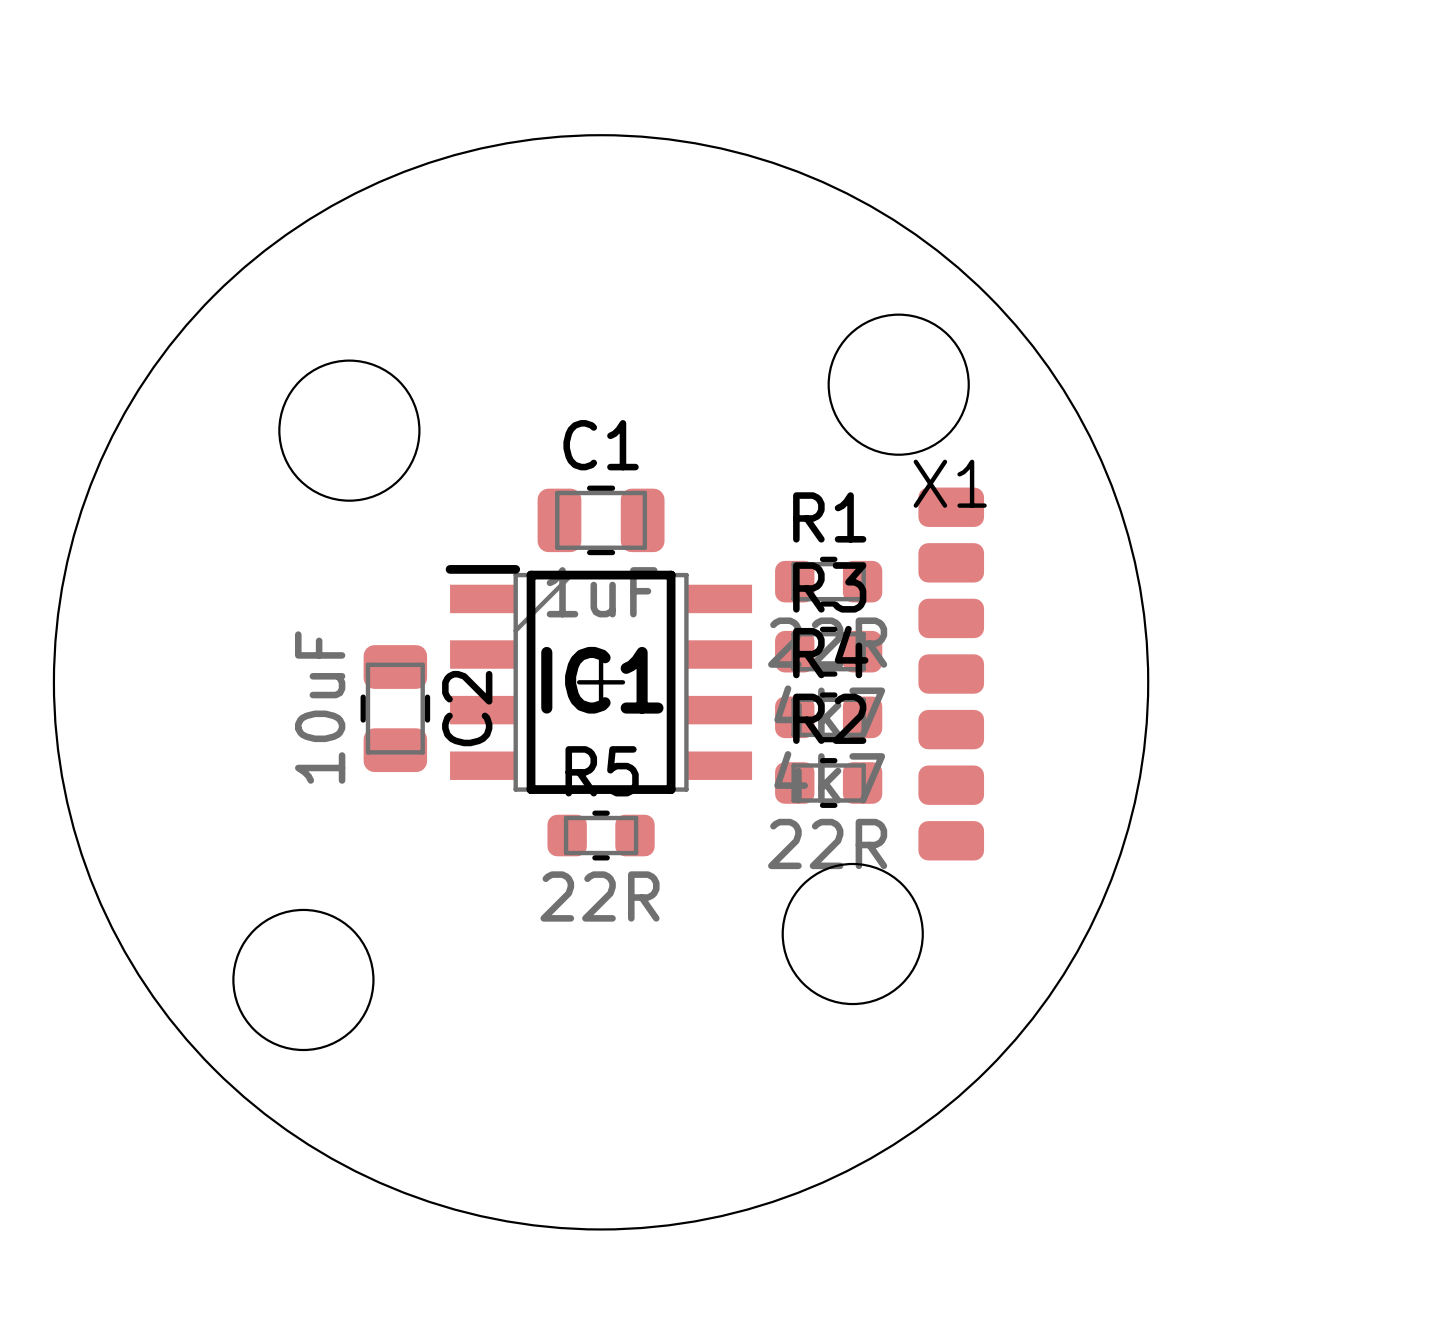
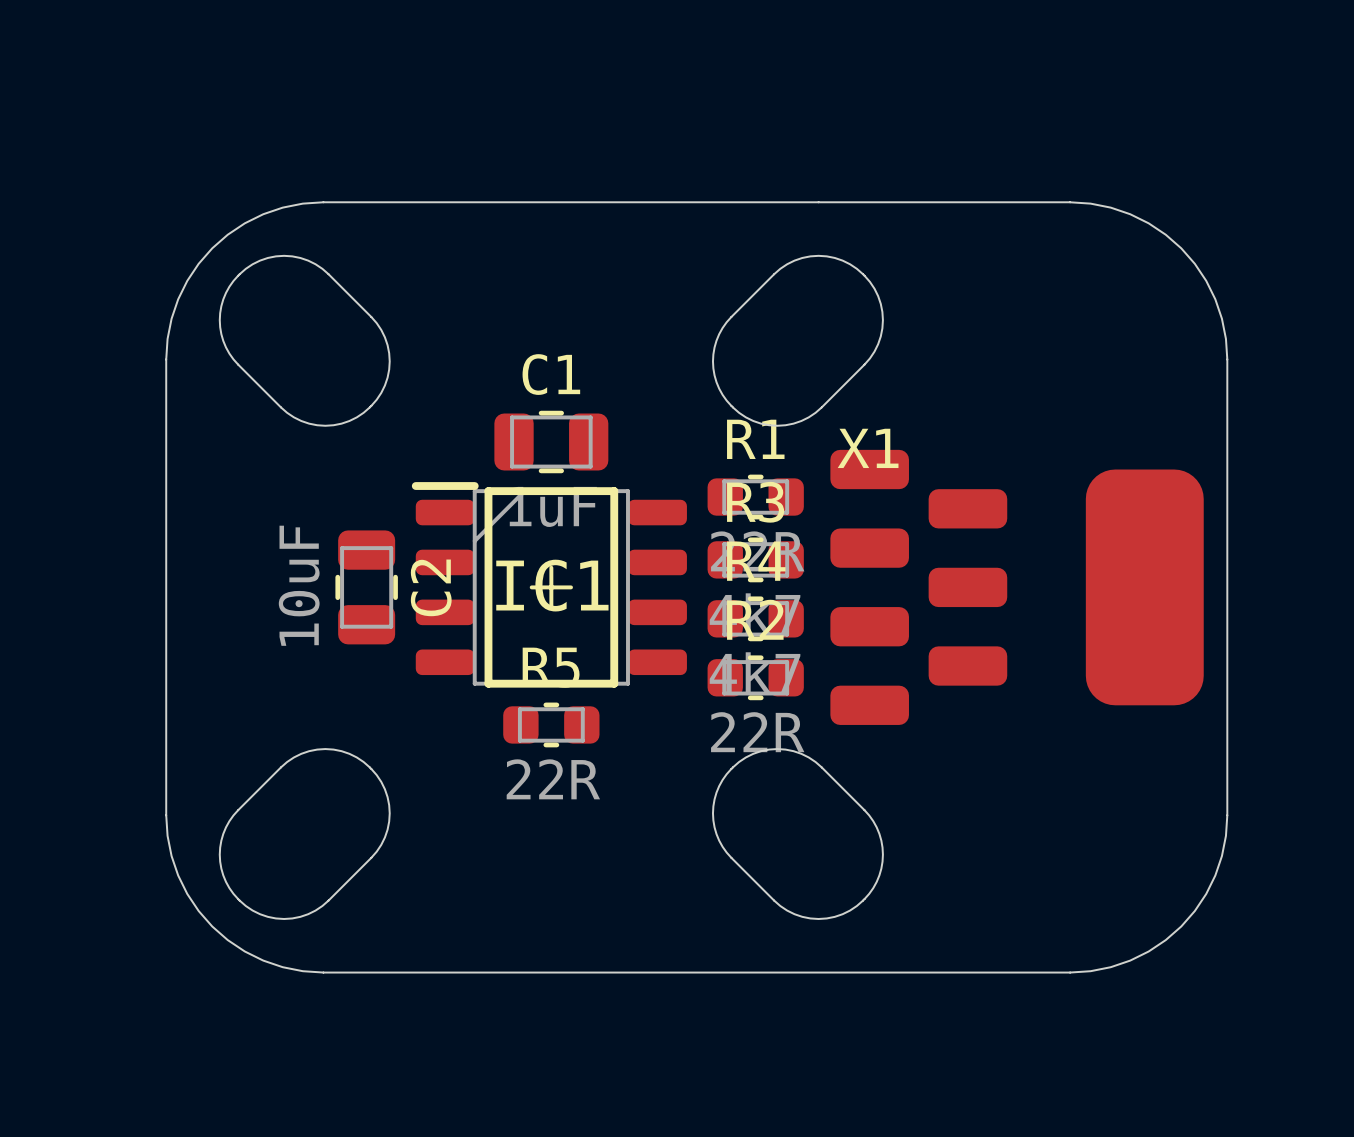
round board edge: [52, 134, 1150, 1231] -> none
board edge: none -> (323, 202) (1070, 202) (1110, 207) (1148, 223) (1165, 234) (1194, 263) (1206, 280) (1221, 318) (1227, 359) (1227, 815) (1221, 856) (1215, 875) (1194, 911) (1181, 926) (1148, 951) (1110, 967) (1070, 972) (323, 972) (302, 971) (263, 960) (227, 940) (198, 911) (187, 893) (178, 875) (167, 835) (167, 338) (171, 318) (187, 280) (212, 248) (244, 223) (263, 214) (282, 207) (323, 202)
round board edge: [827, 313, 970, 456] -> none
board edge: none -> (239, 274) (226, 292) (221, 306) (219, 320) (221, 334) (226, 347) (238, 364) (287, 412) (309, 423) (325, 425) (341, 423) (356, 417) (369, 407) (384, 385) (389, 361) (384, 337) (371, 316) (322, 268) (300, 257) (284, 255) (267, 257) (252, 264) (239, 274)
board edge: none -> (774, 274) (722, 327) (714, 347) (712, 361) (714, 375) (719, 388) (732, 407) (753, 420) (777, 425) (801, 420) (815, 412) (864, 364) (878, 344) (882, 320) (880, 303) (869, 281) (856, 268) (842, 260) (826, 256) (810, 256) (794, 260) (774, 274)
round board edge: [278, 359, 421, 502] -> none
X1 name position: X1 (950, 483) -> X1 (868, 448)
X1 footprint: [918, 487, 985, 861] -> [830, 449, 1204, 725]
IC1 footprint: [445, 565, 753, 794] -> [411, 482, 687, 688]
C2 position: (395, 708) -> (366, 587)
round board edge: [781, 862, 924, 1006] -> none
board edge: none -> (280, 767) (229, 821) (223, 833) (219, 854) (221, 868) (226, 881) (239, 900) (260, 914) (284, 918) (300, 916) (322, 905) (371, 857) (384, 837) (389, 813) (384, 789) (376, 775) (363, 762) (349, 753) (325, 749) (309, 751) (293, 757) (280, 767)
board edge: none -> (732, 767) (719, 786) (714, 799) (712, 813) (716, 834) (722, 846) (731, 857) (780, 905) (802, 916) (818, 918) (834, 916) (850, 910) (863, 900) (876, 881) (881, 868) (882, 854) (881, 840) (876, 827) (864, 810) (815, 762) (793, 751) (777, 749) (761, 751) (745, 757) (732, 767)
round board edge: [232, 908, 375, 1052] -> none

